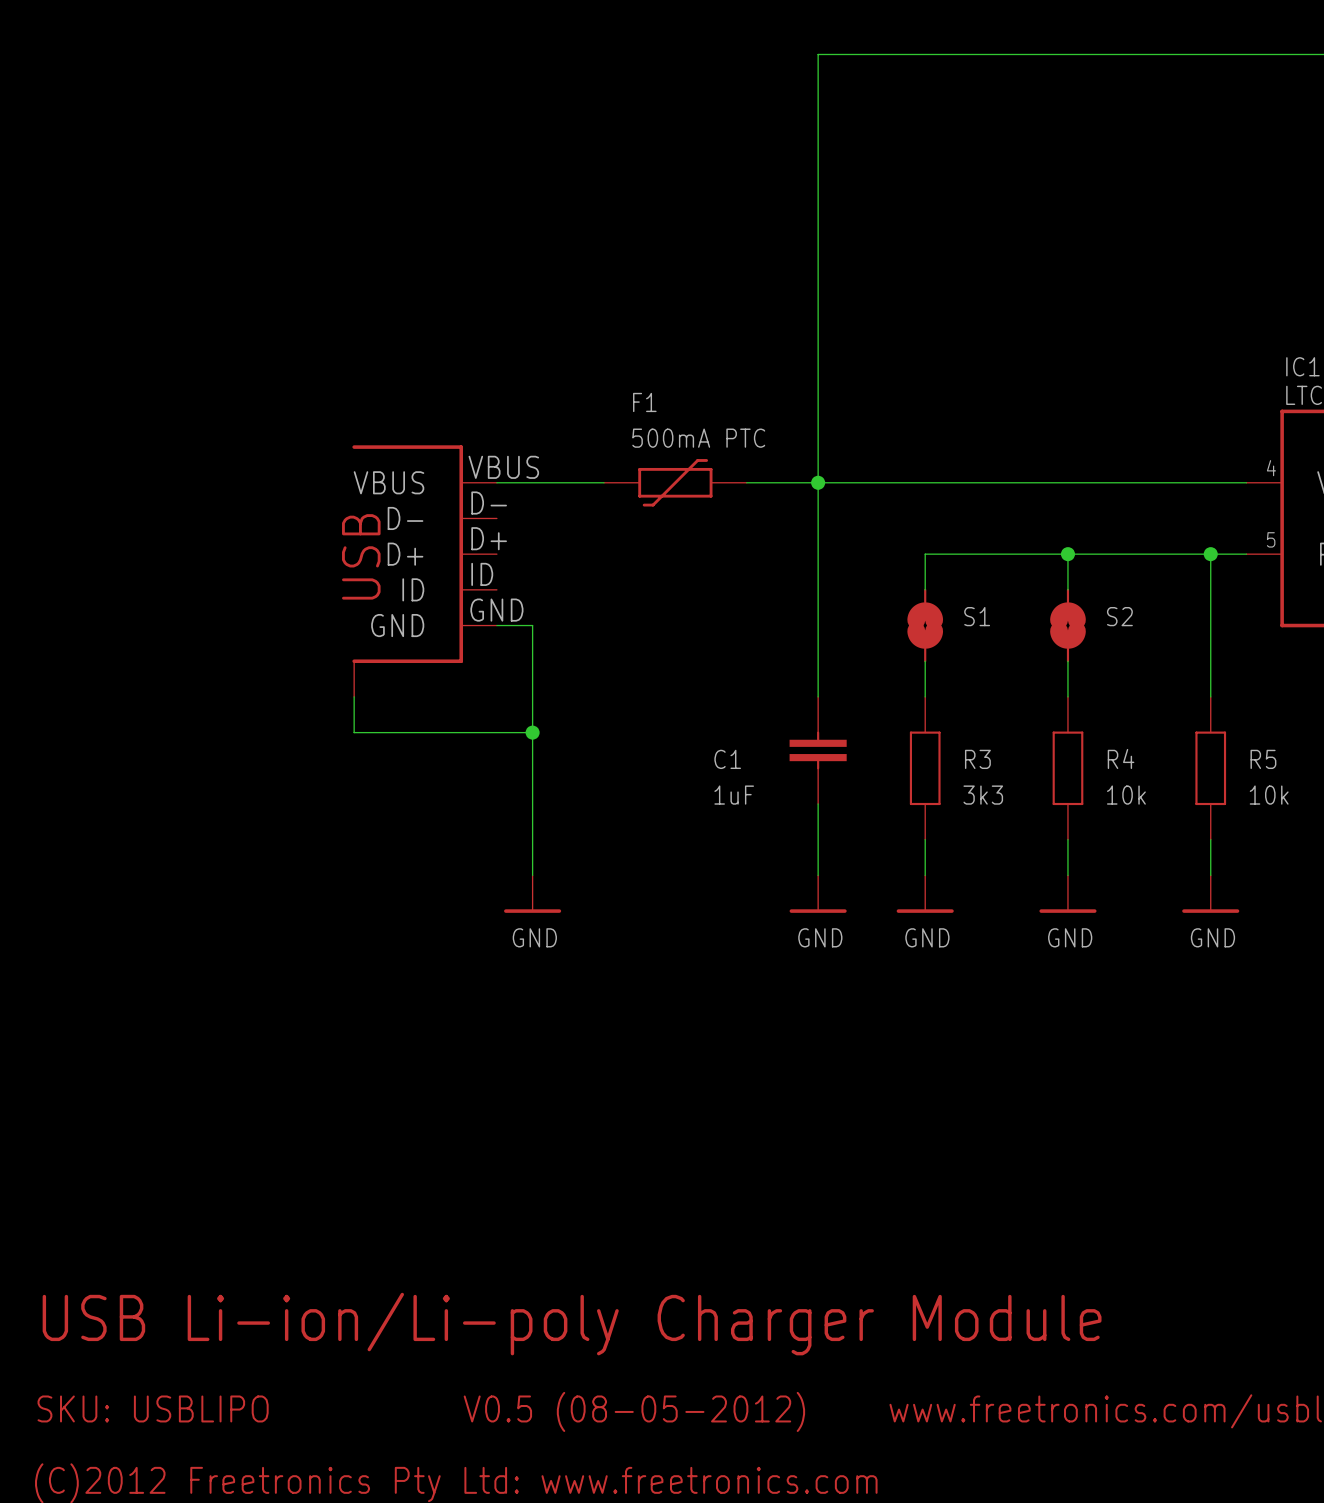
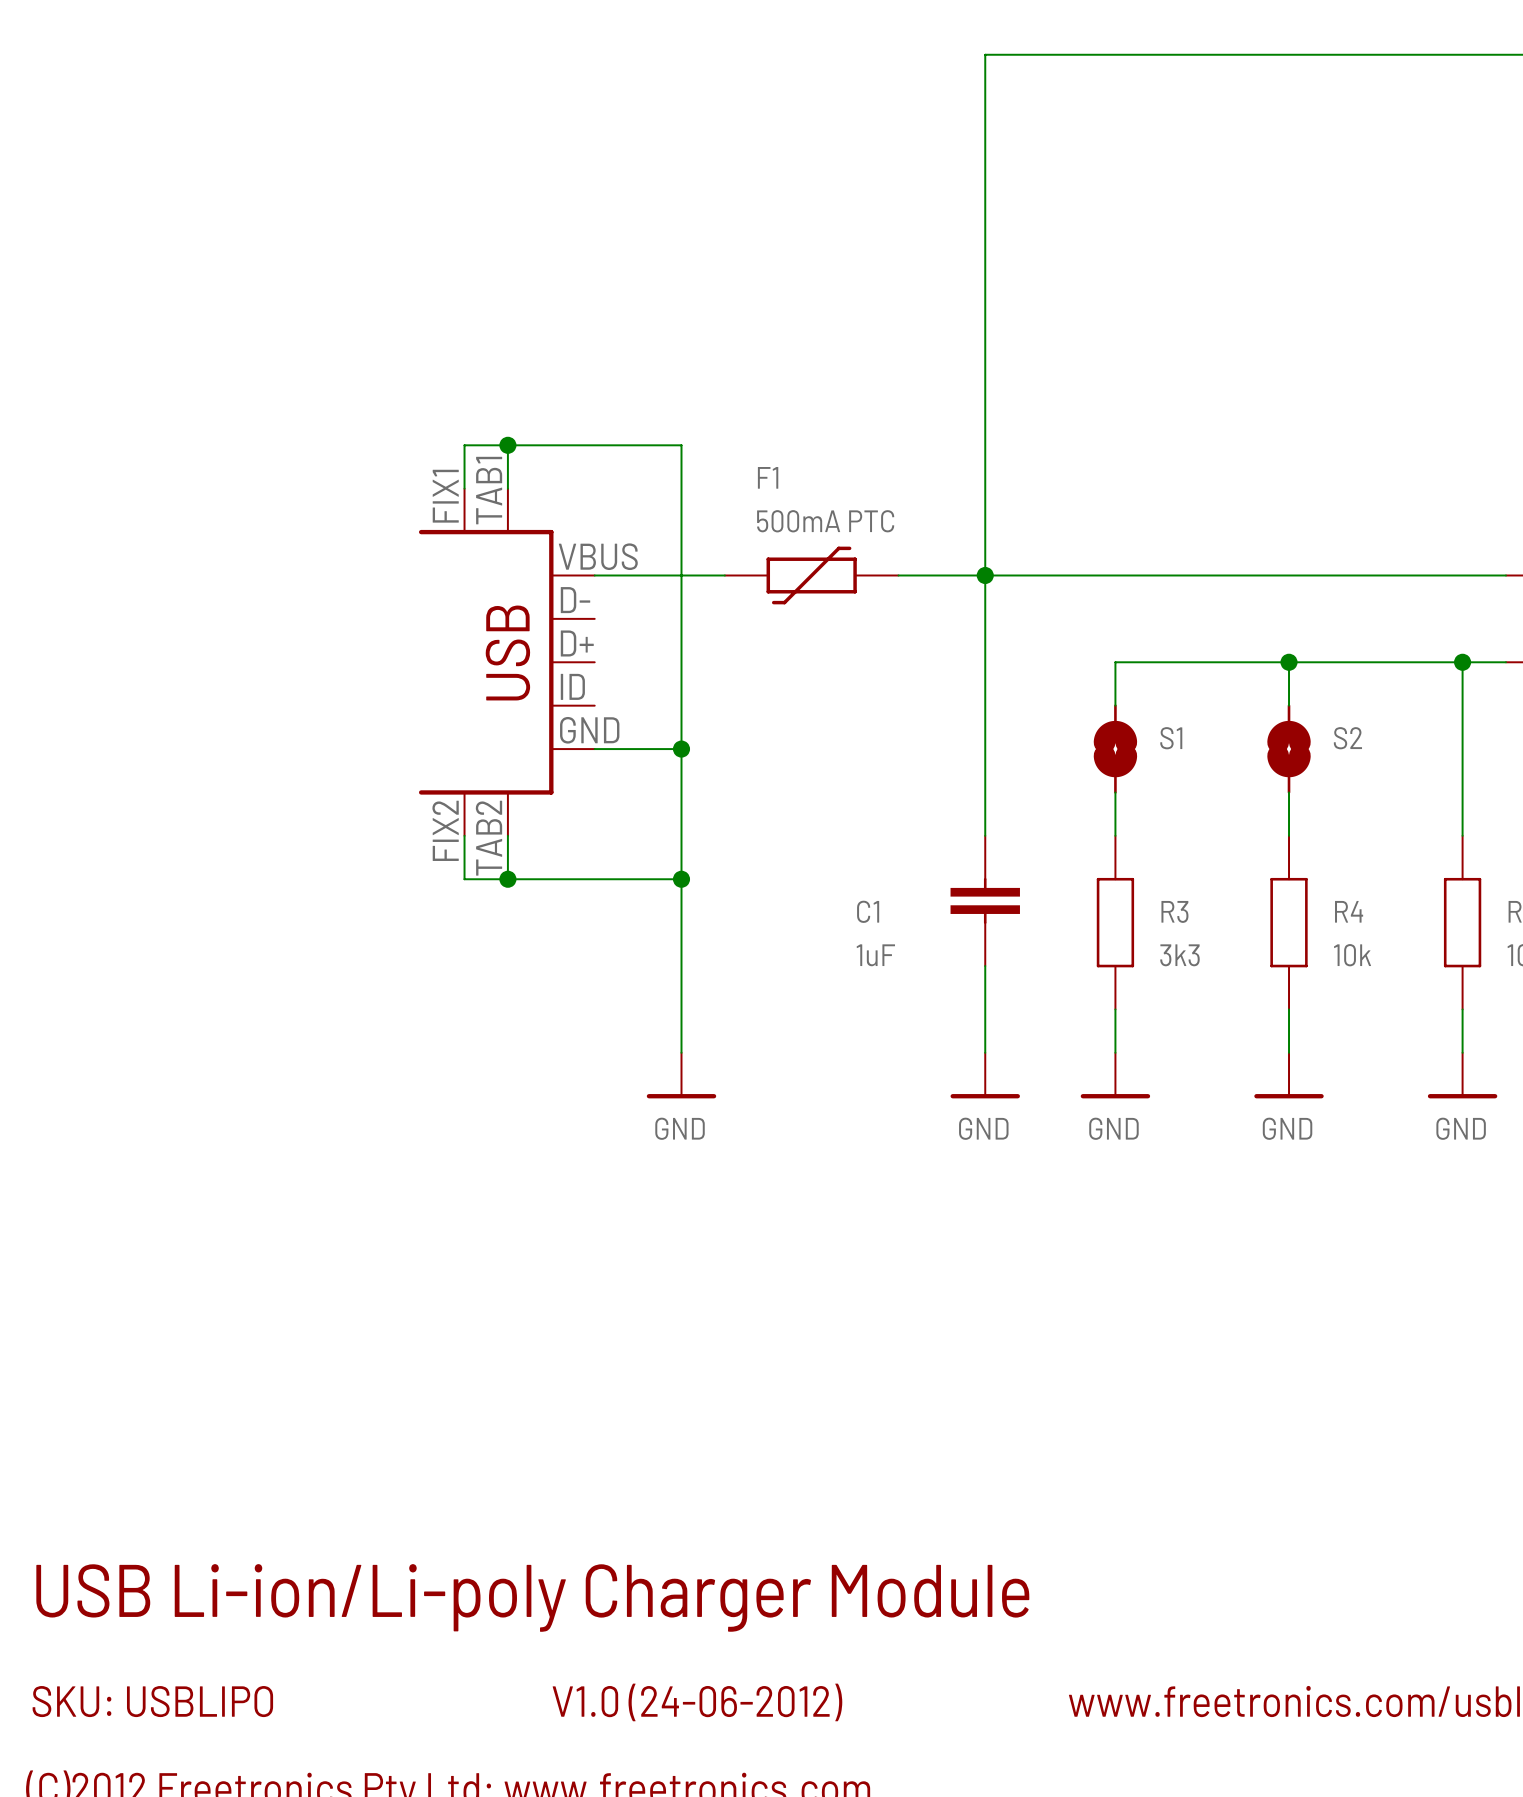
wire: none -> (507, 445) (507, 488)
junction: none -> (507, 445)
wire: none -> (464, 488) (464, 445) (681, 445) (681, 1052)
part: none -> (506, 662)
part: (424, 571) -> none
wire: (532, 625) (532, 875) -> (638, 749) (681, 749)
junction: none -> (681, 749)
wire: (354, 696) (354, 732) (389, 732) -> (464, 835) (464, 879)
wire: none -> (507, 835) (507, 879)
junction: none -> (507, 879)
wire: none -> (638, 879) (681, 879)
junction position: (532, 732) -> (681, 879)
power symbol position: GND (532, 894) -> GND (681, 1075)
text: V0.5 (08-05-2012) (634, 1411) -> V1.0 (24-06-2012) (697, 1702)

